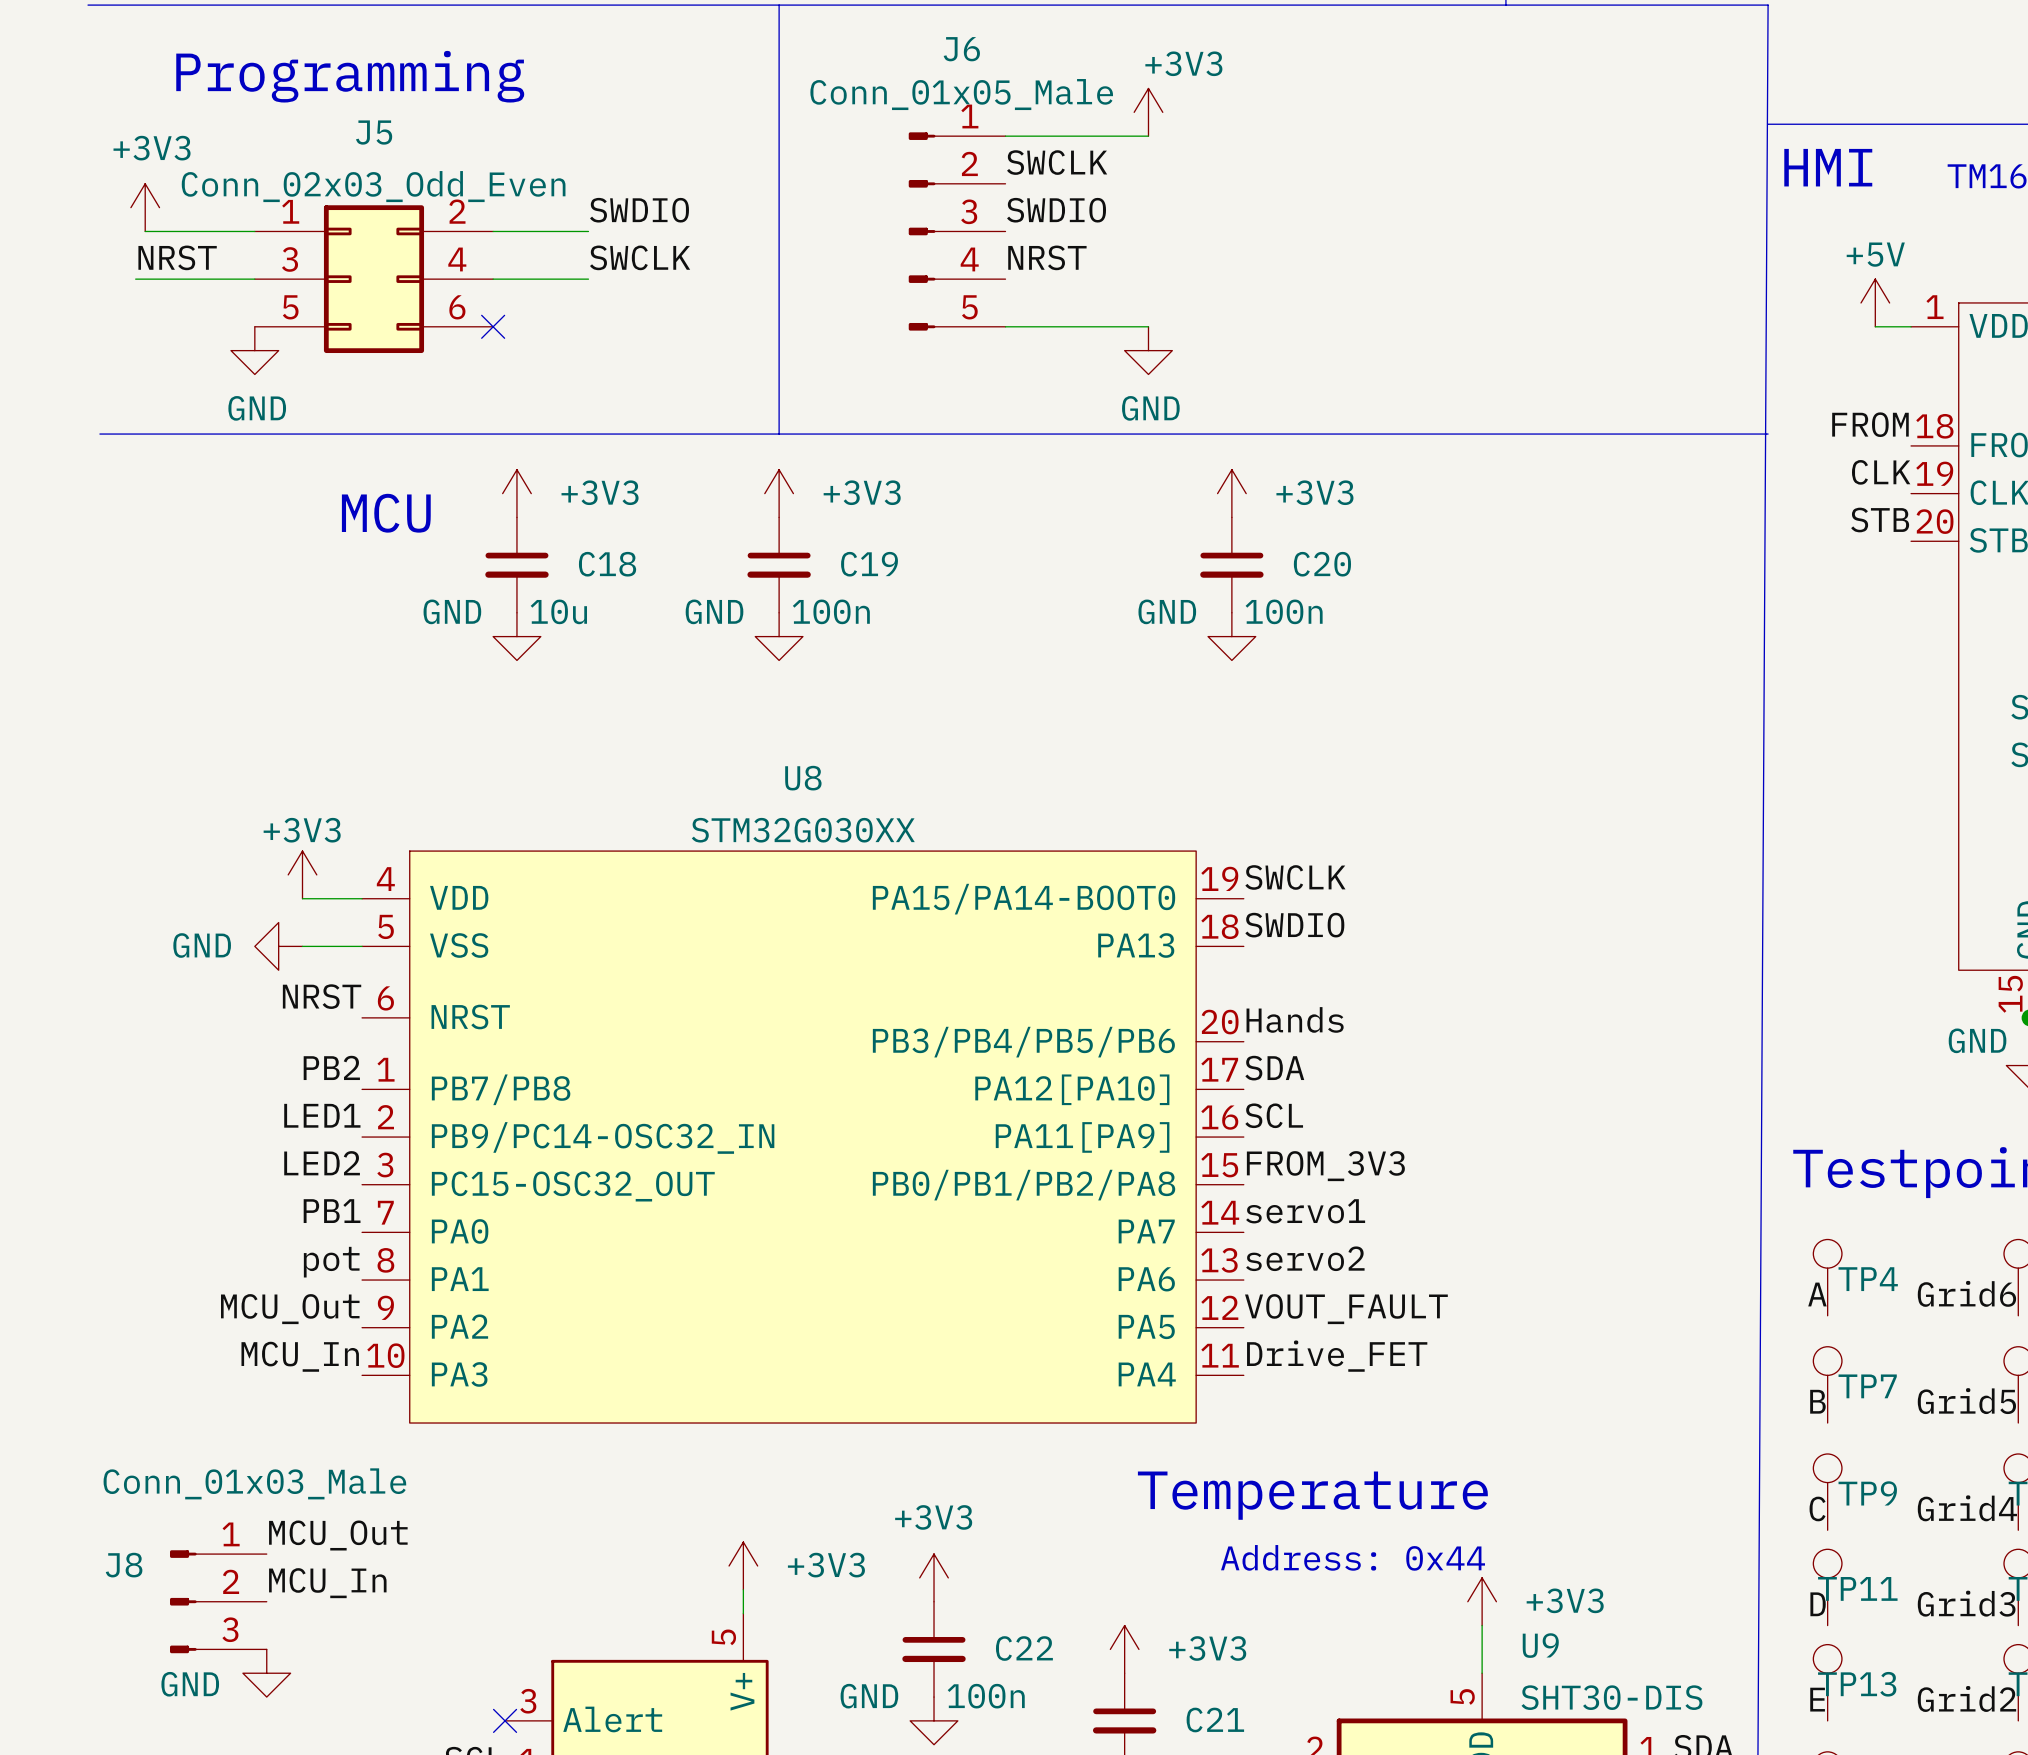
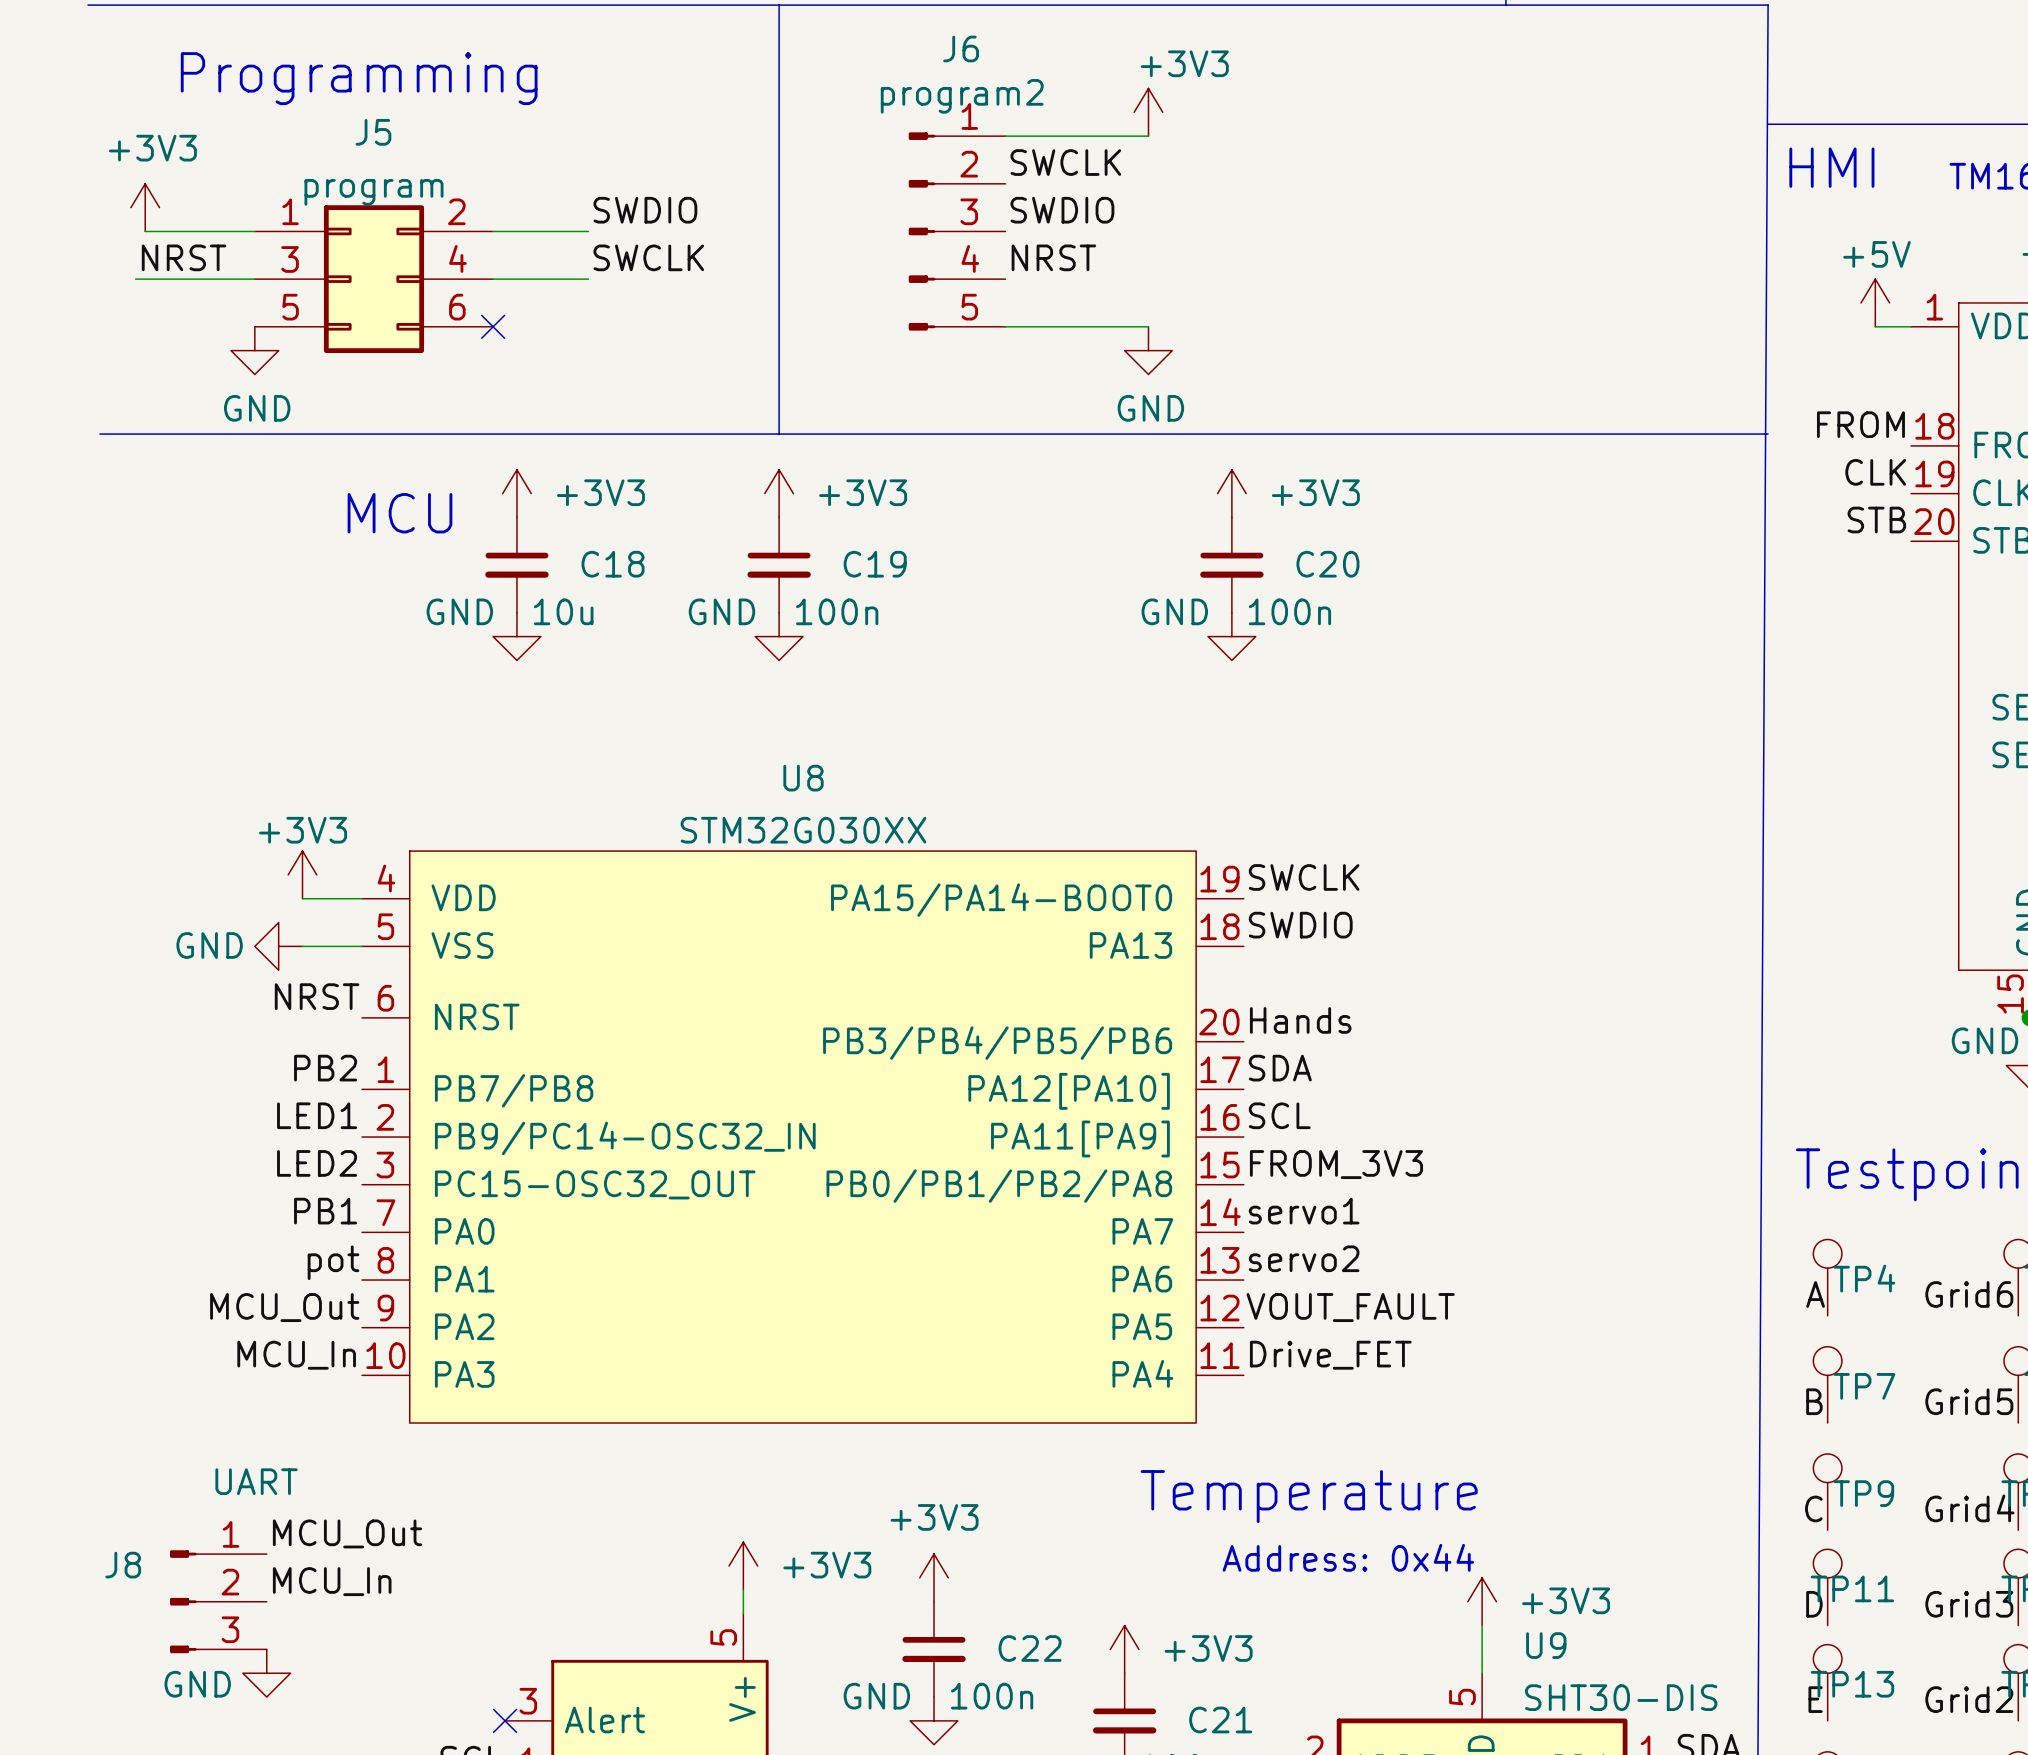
J6 value: Conn_01x05_Male (961, 94) -> program2 (962, 96)
J5 value: Conn_02x03_Odd_Even (373, 186) -> program (373, 192)
J8 value: Conn_01x03_Male (254, 1483) -> UART (256, 1481)

